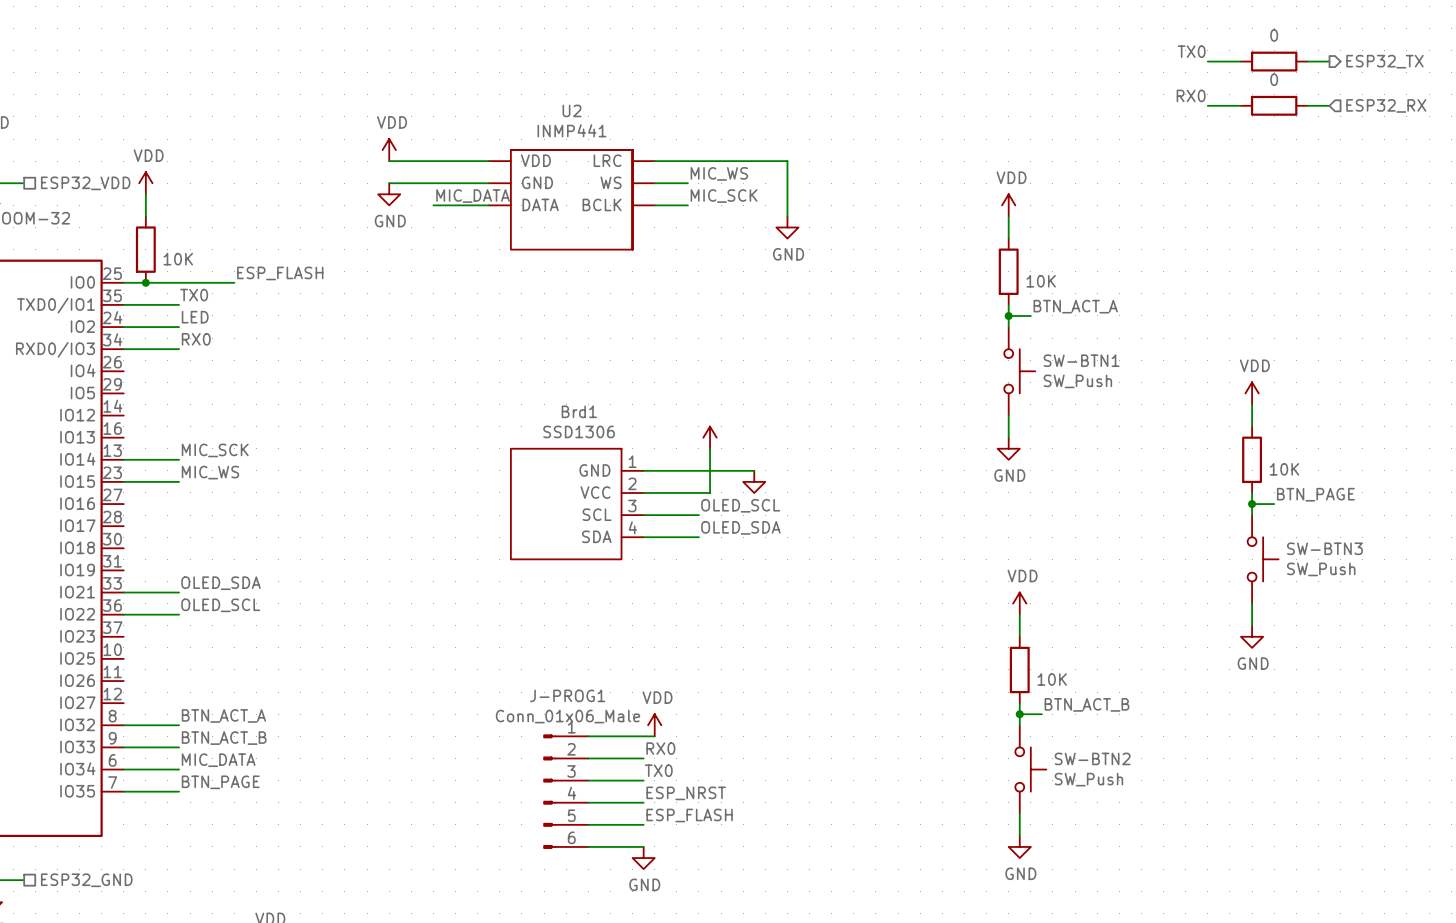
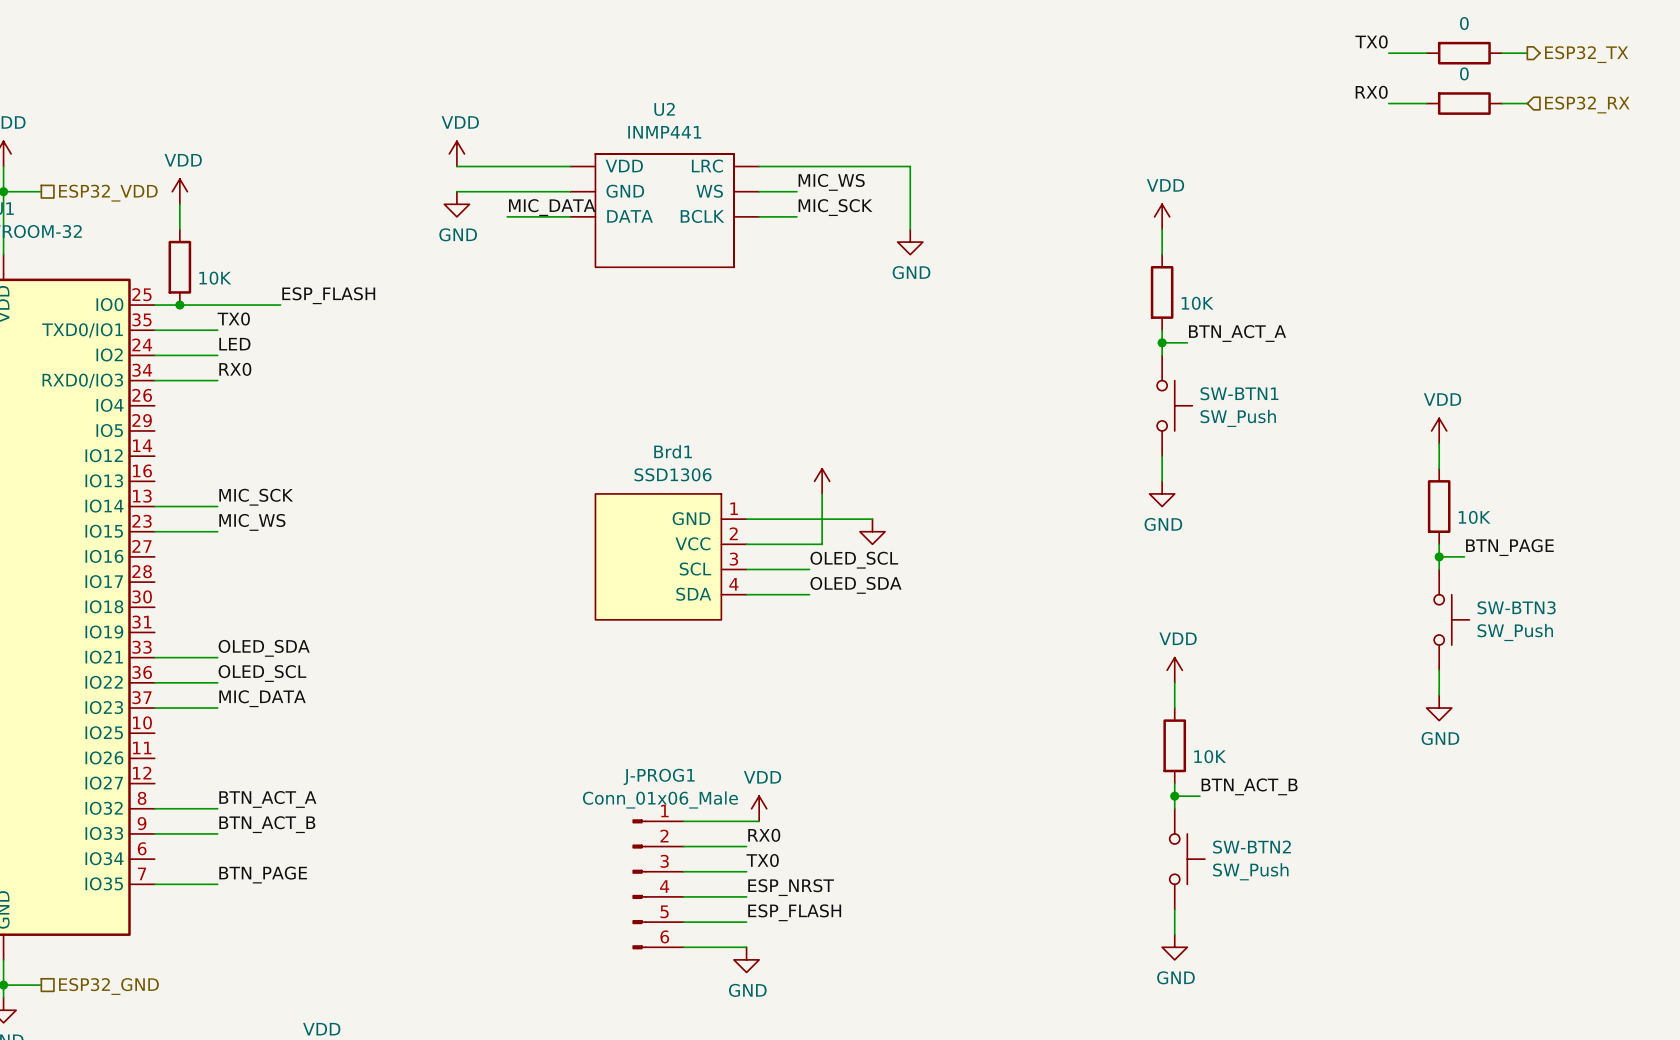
label position: MIC_DATA (218, 760) -> MIC_DATA (262, 698)
wire: (123, 769) (179, 769) -> (154, 708) (217, 708)

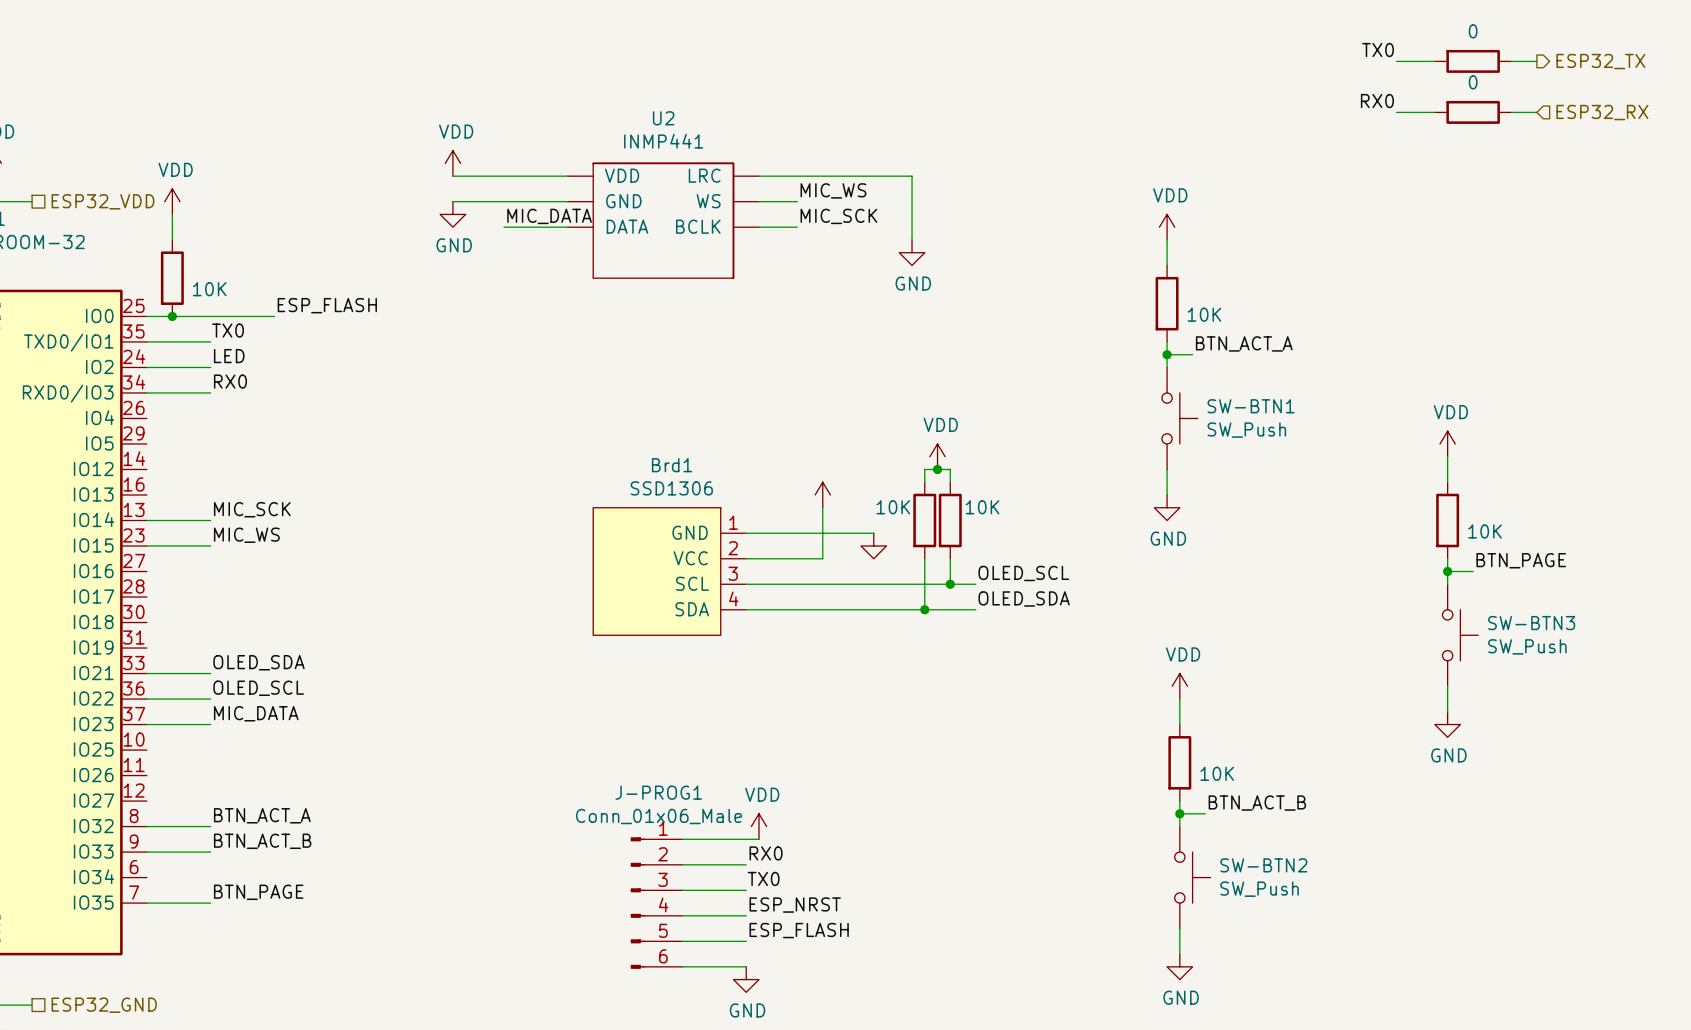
power symbol: none -> VDD (937, 456)
junction: none -> (937, 469)
wire: none -> (924, 482) (924, 469) (950, 469) (950, 482)
part: none -> 10K (924, 520)
part: none -> 10K (950, 520)
wire: none -> (924, 558) (924, 609)
wire: none -> (950, 558) (950, 584)
label position: OLED_SCL (854, 560) -> OLED_SCL (1023, 573)
wire: none -> (810, 584) (975, 584)
junction: none -> (950, 584)
label position: OLED_SDA (856, 585) -> OLED_SDA (1024, 598)
wire: none -> (810, 609) (975, 609)
junction: none -> (924, 609)

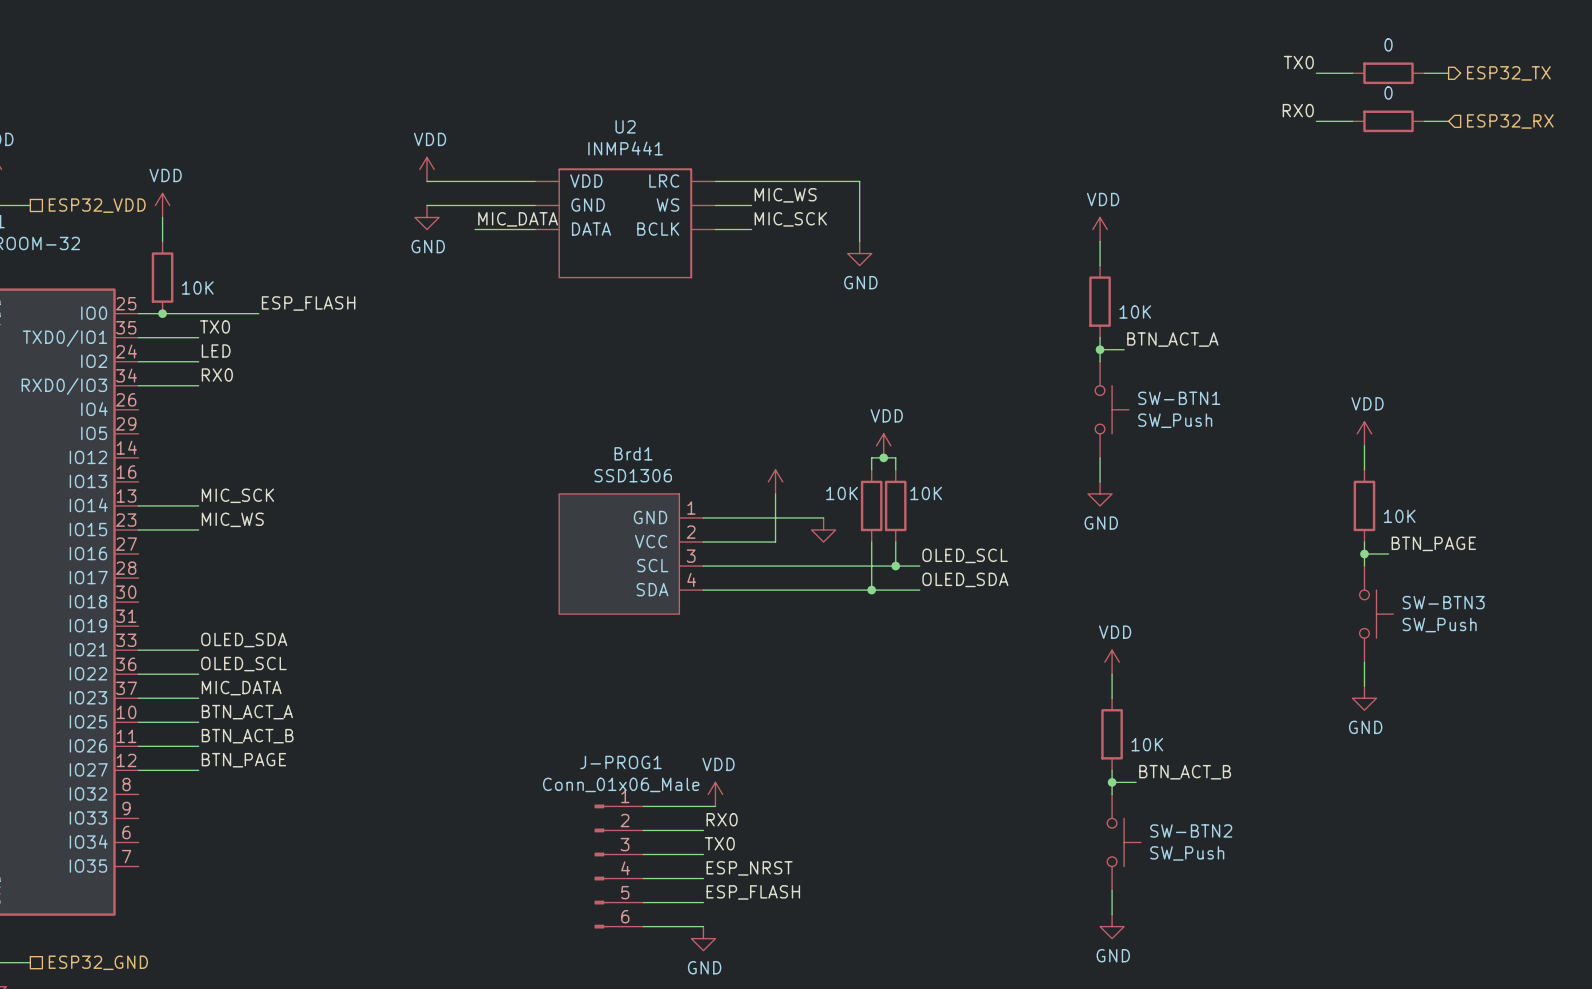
label position: BTN_ACT_A (262, 815) -> BTN_ACT_A (247, 712)
wire: (146, 826) (210, 826) -> (138, 746) (198, 746)
label position: BTN_ACT_B (262, 841) -> BTN_ACT_B (247, 736)
wire: (146, 852) (210, 852) -> (138, 770) (198, 770)
label position: BTN_PAGE (258, 892) -> BTN_PAGE (243, 760)
wire: (146, 903) (210, 903) -> (138, 722) (198, 722)

